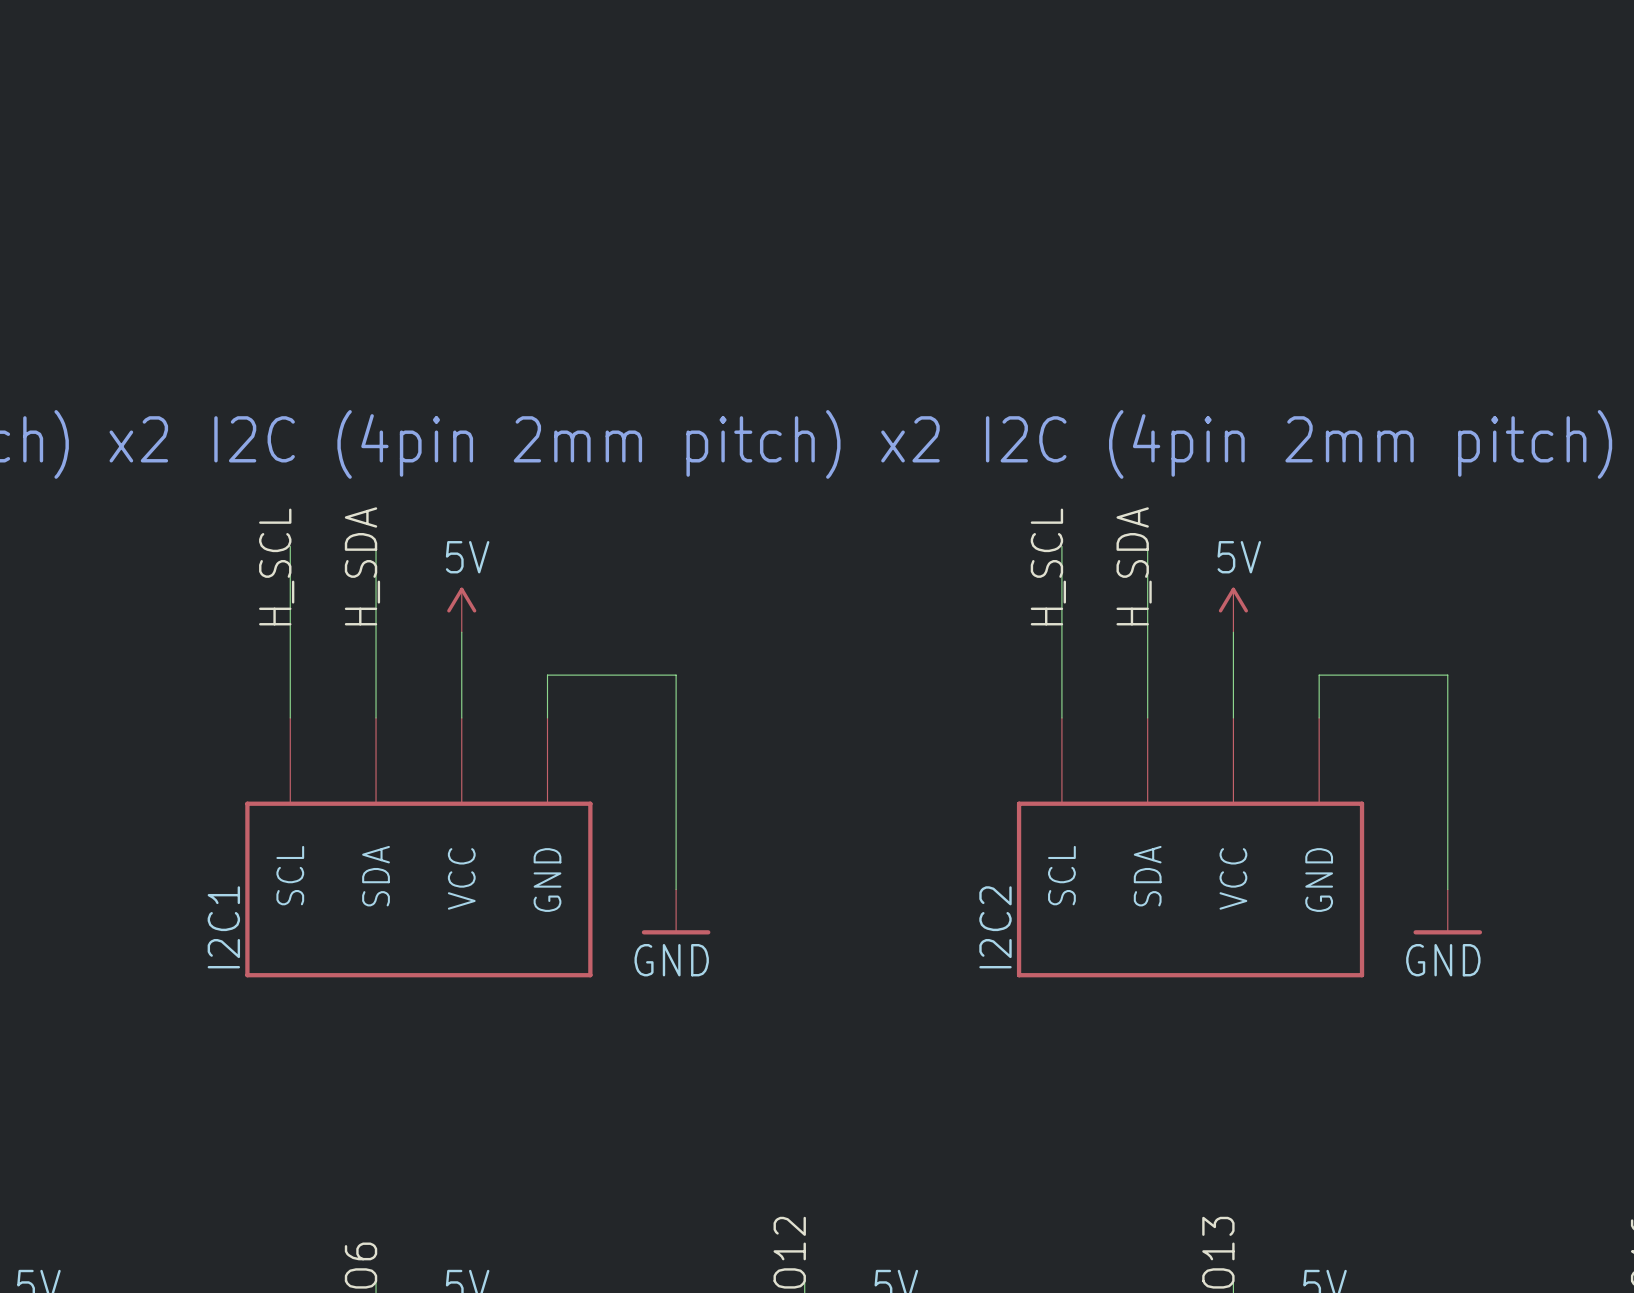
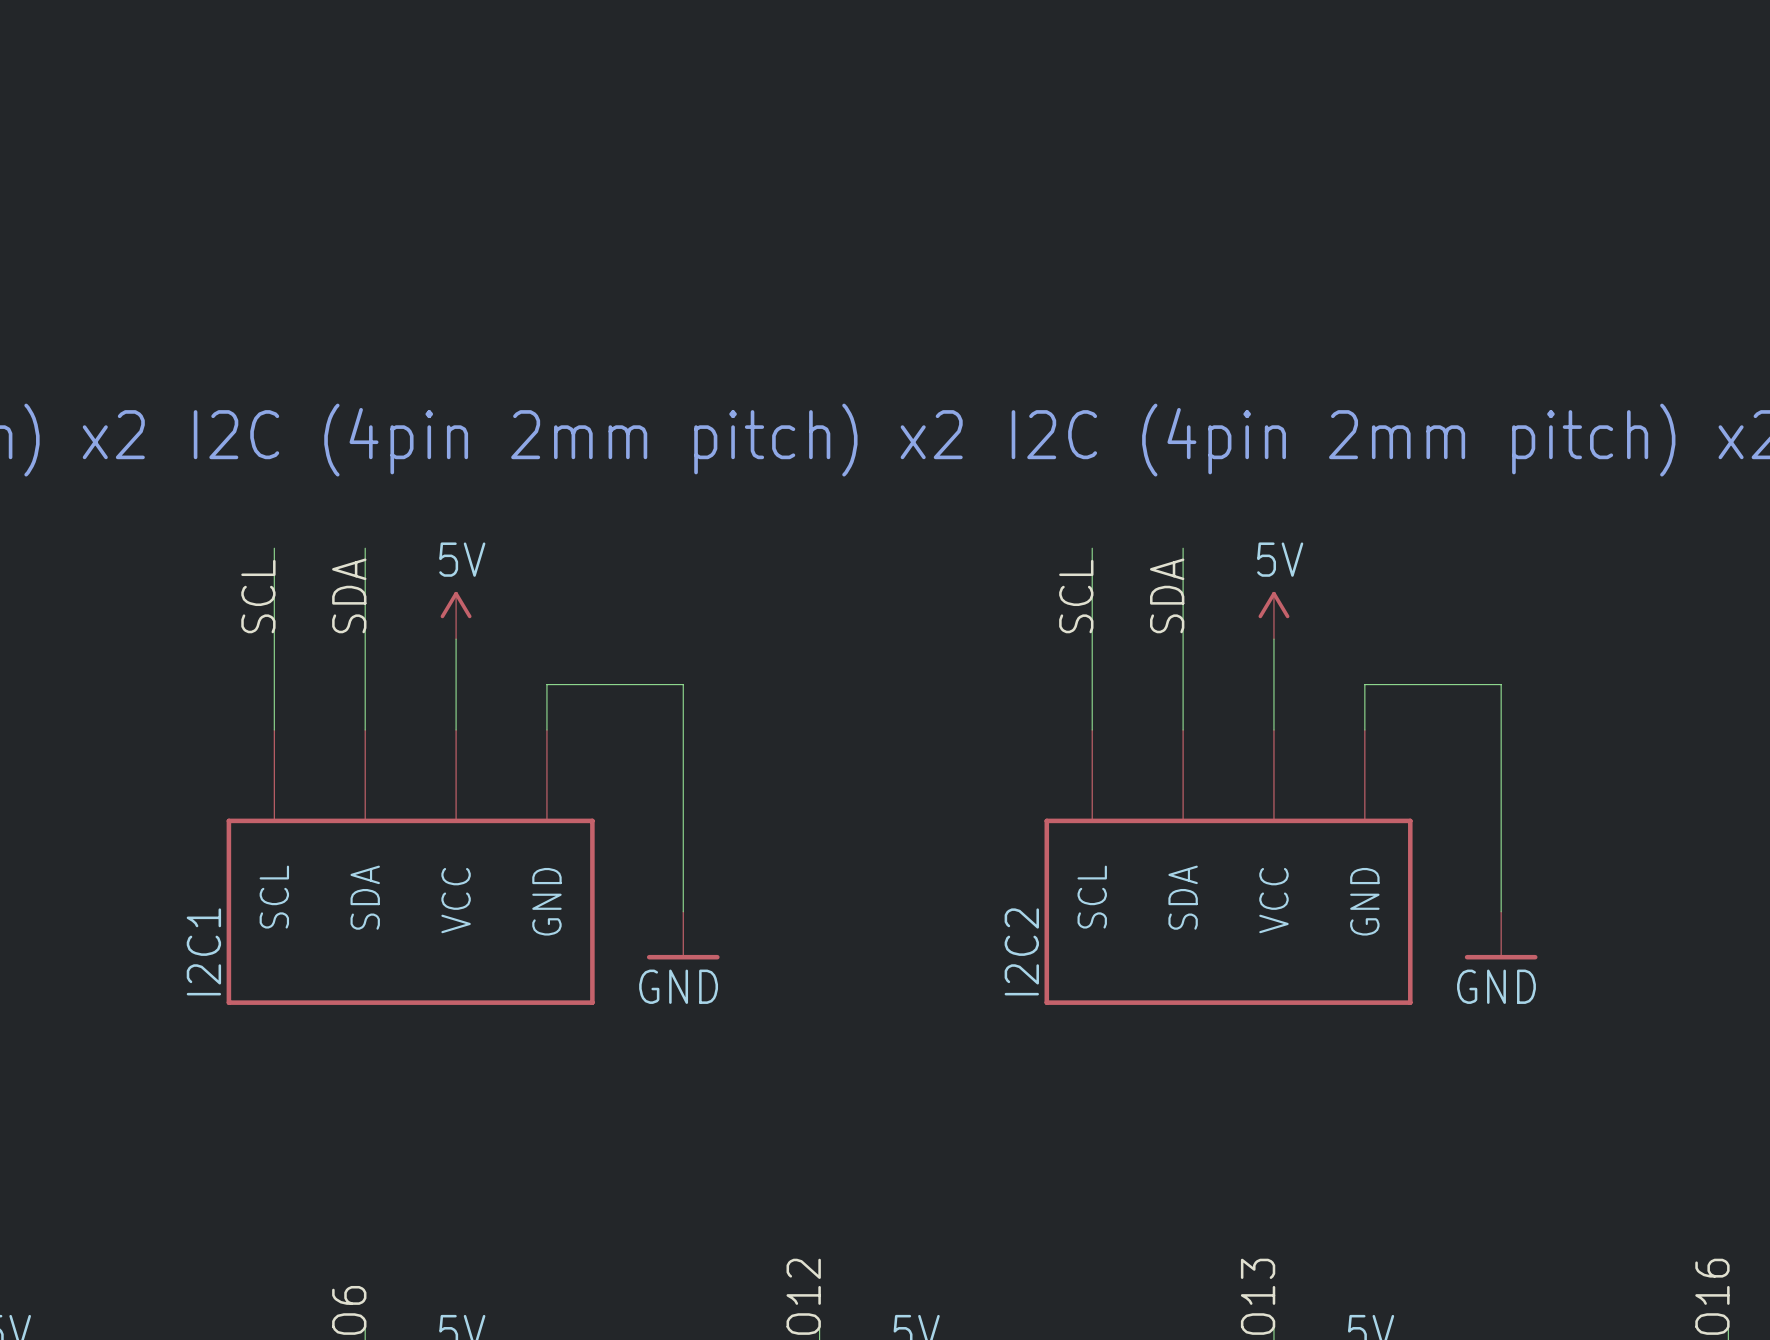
label: H_SDA (362, 566) -> SDA (349, 595)
label: H_SDA (1134, 566) -> SDA (1167, 595)
label: H_SCL (276, 567) -> SCL (258, 596)
label: H_SCL (1048, 567) -> SCL (1076, 596)

